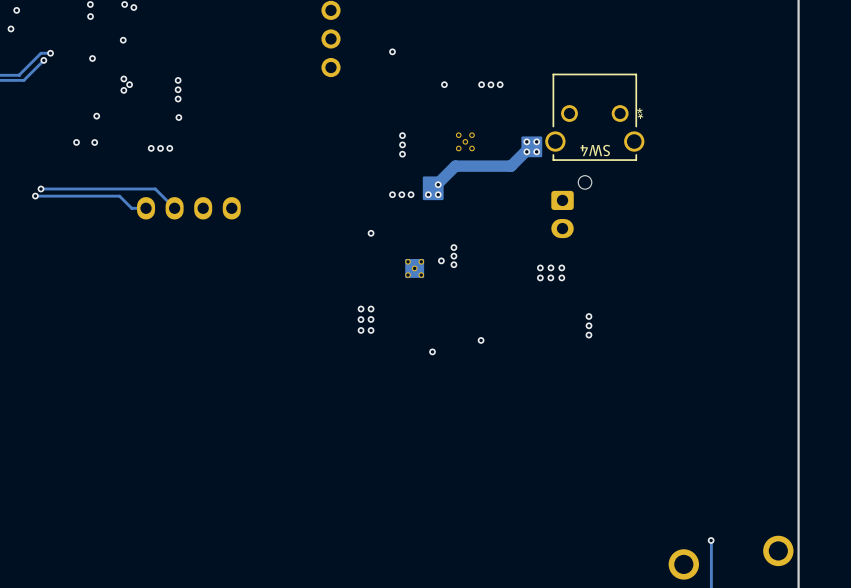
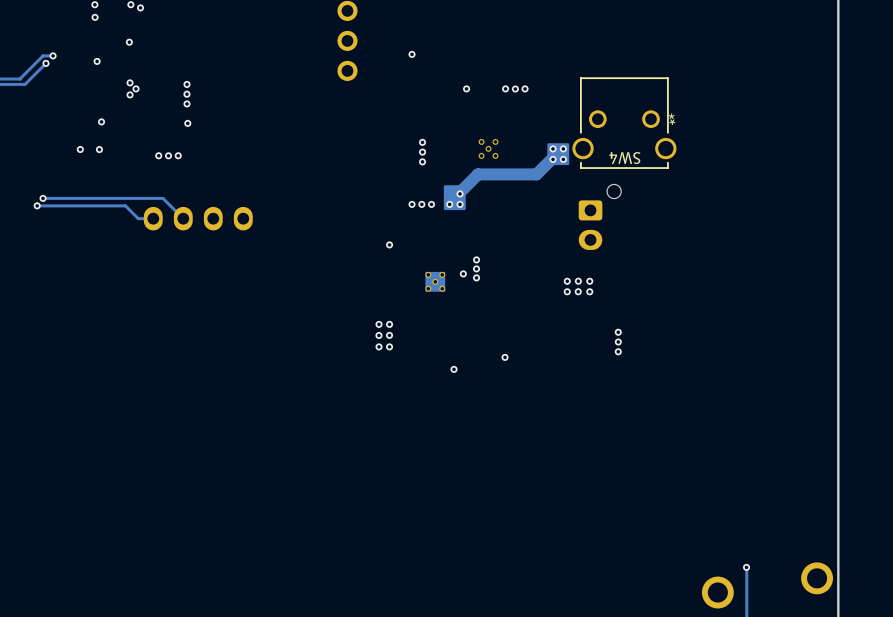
via: (16, 10) -> none
via: (10, 28) -> none

